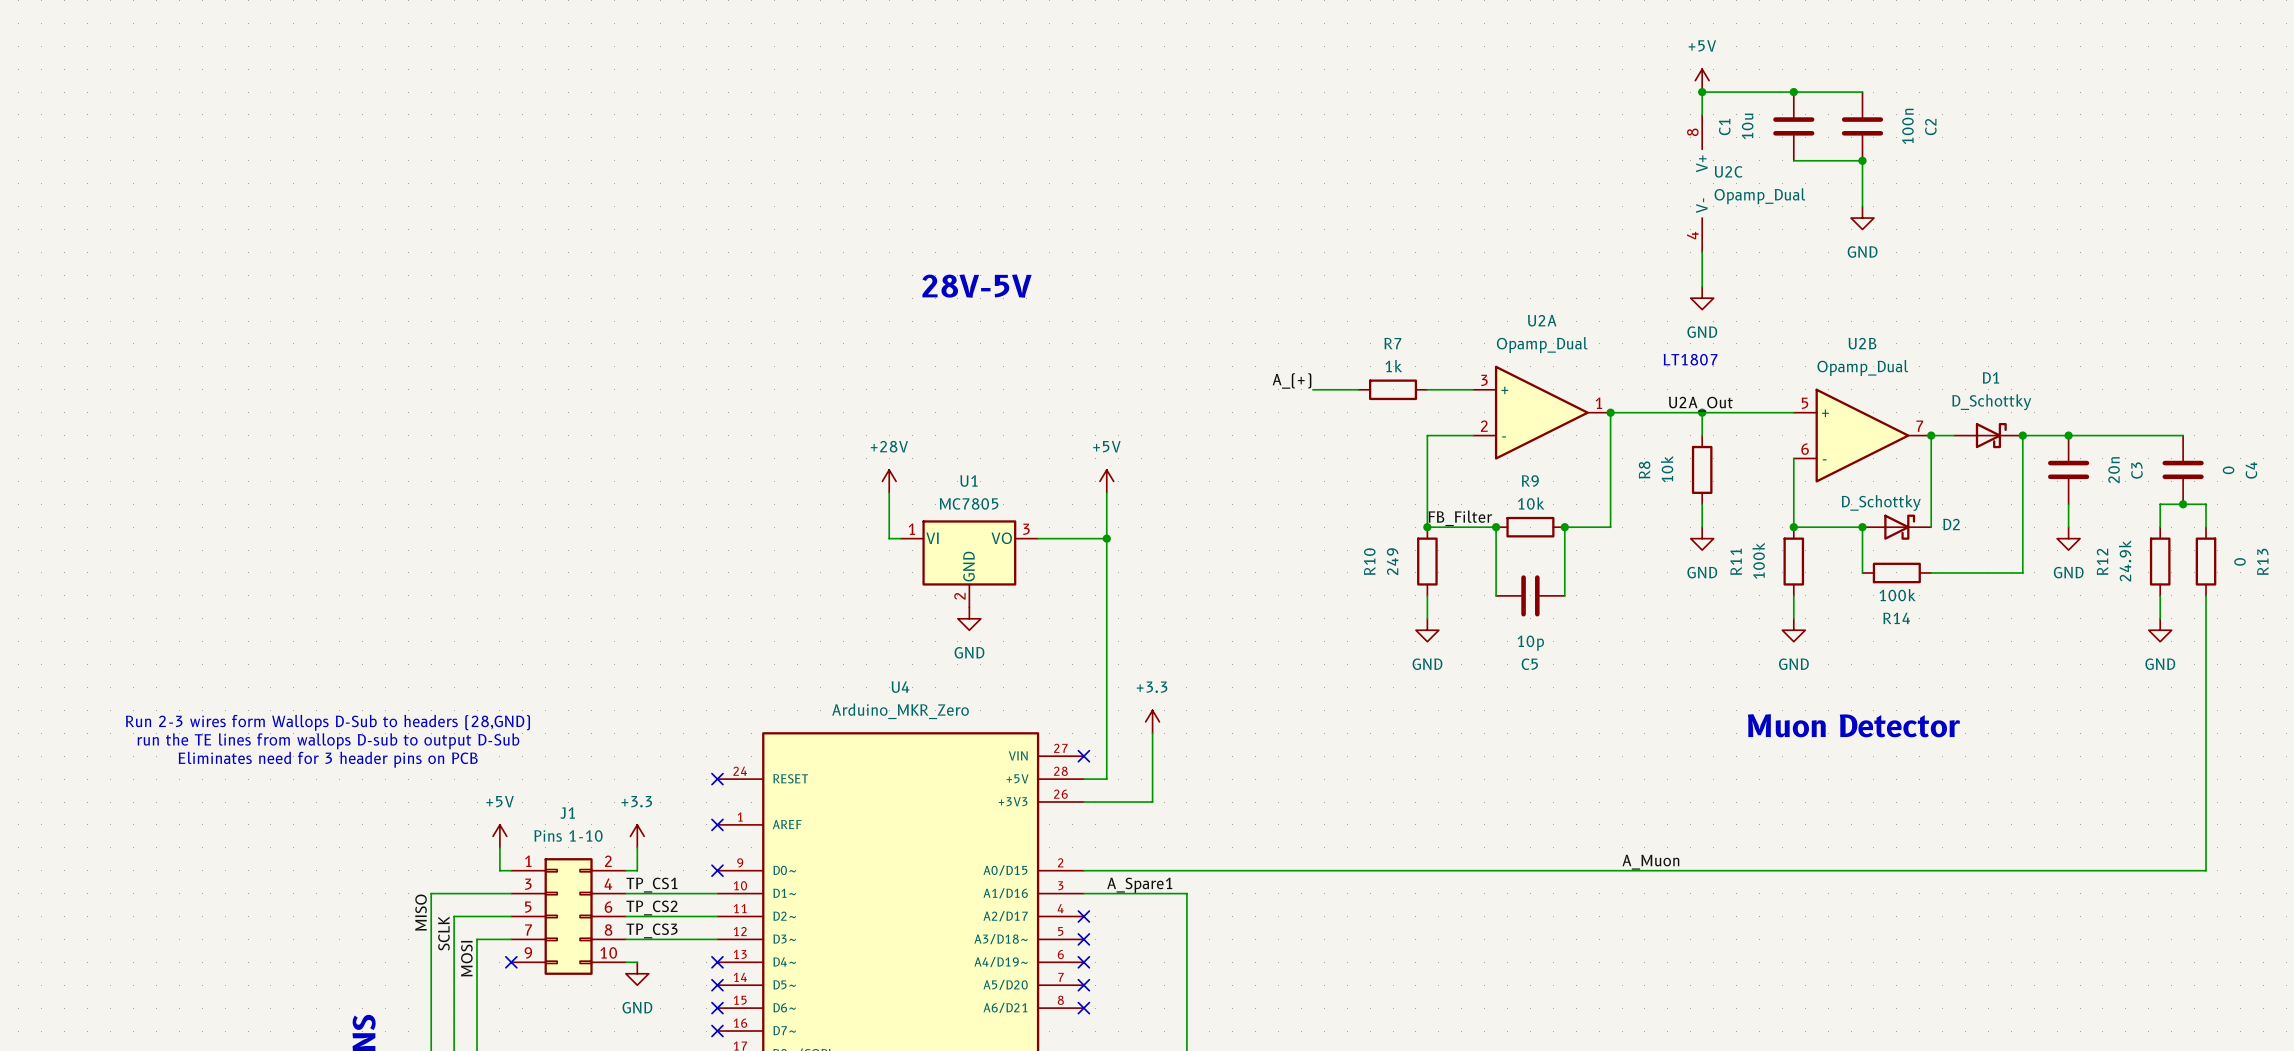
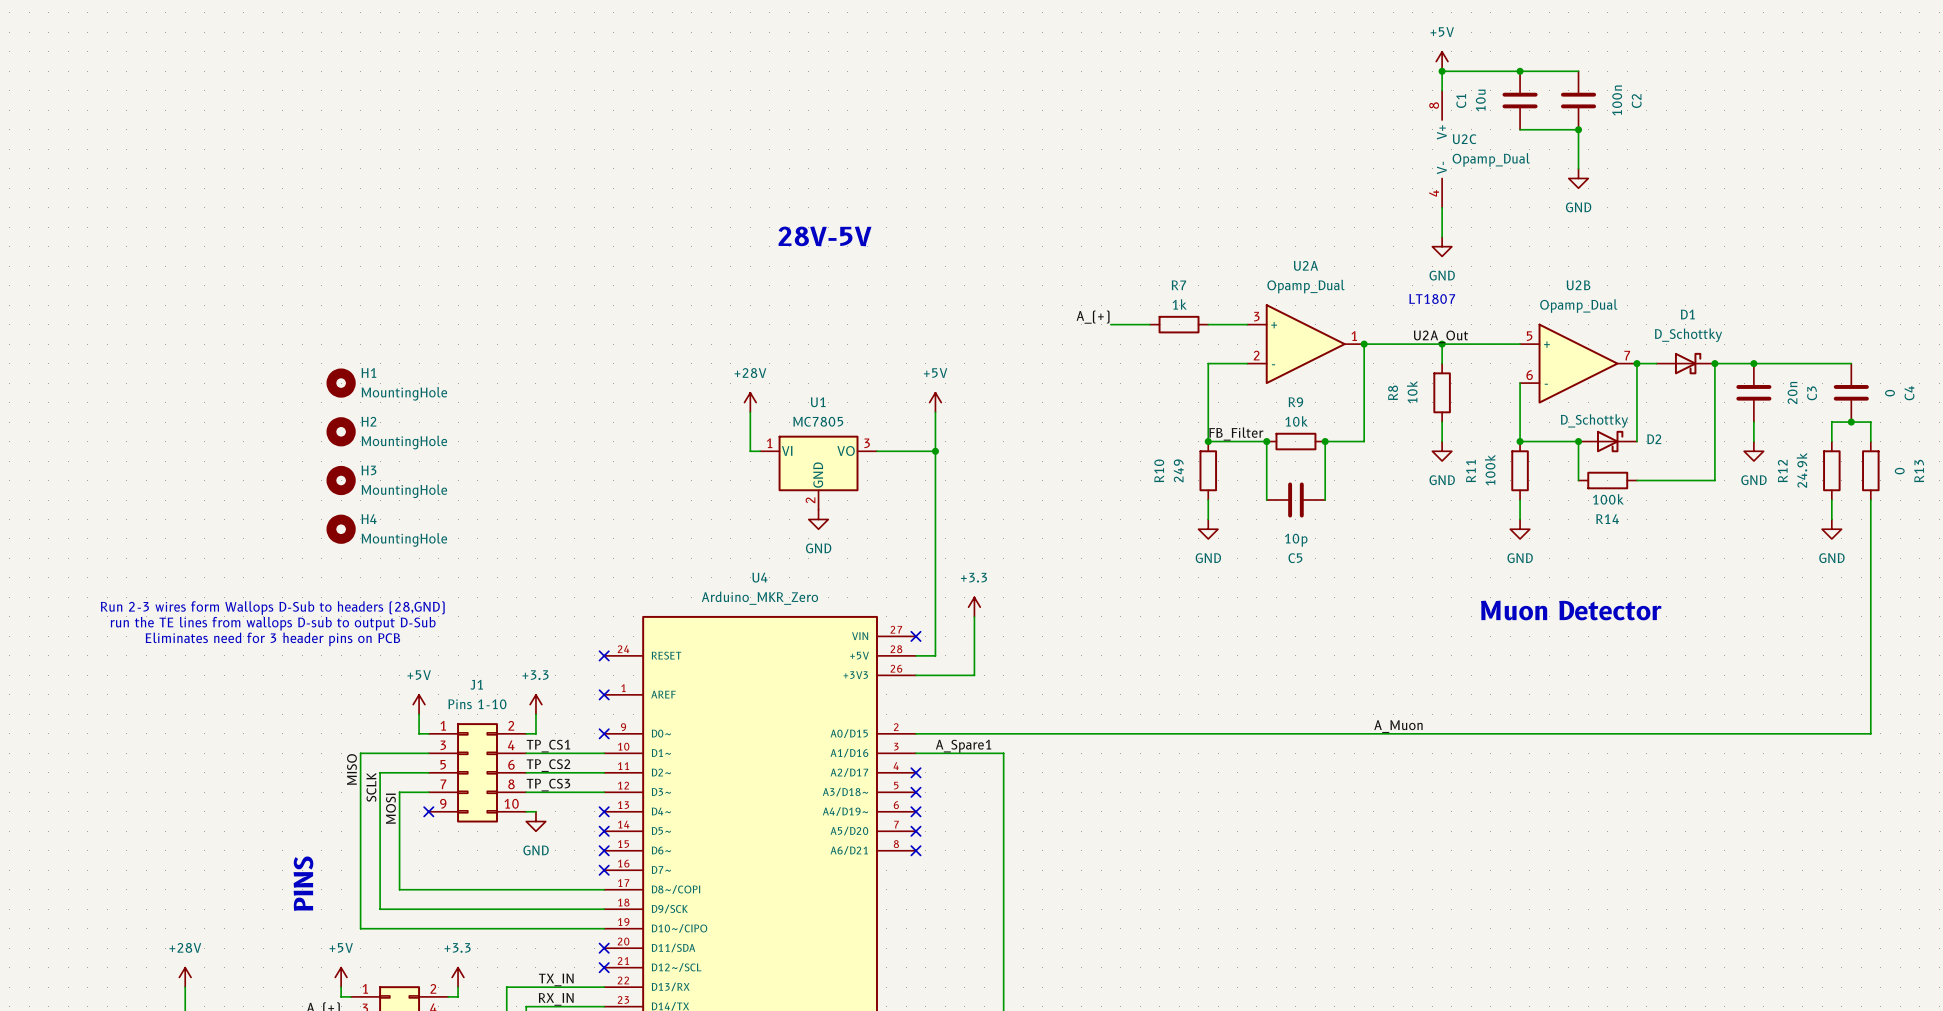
H1: none -> MountingHole (341, 383)
H2: none -> MountingHole (341, 431)
H3: none -> MountingHole (341, 480)
H4: none -> MountingHole (341, 529)

